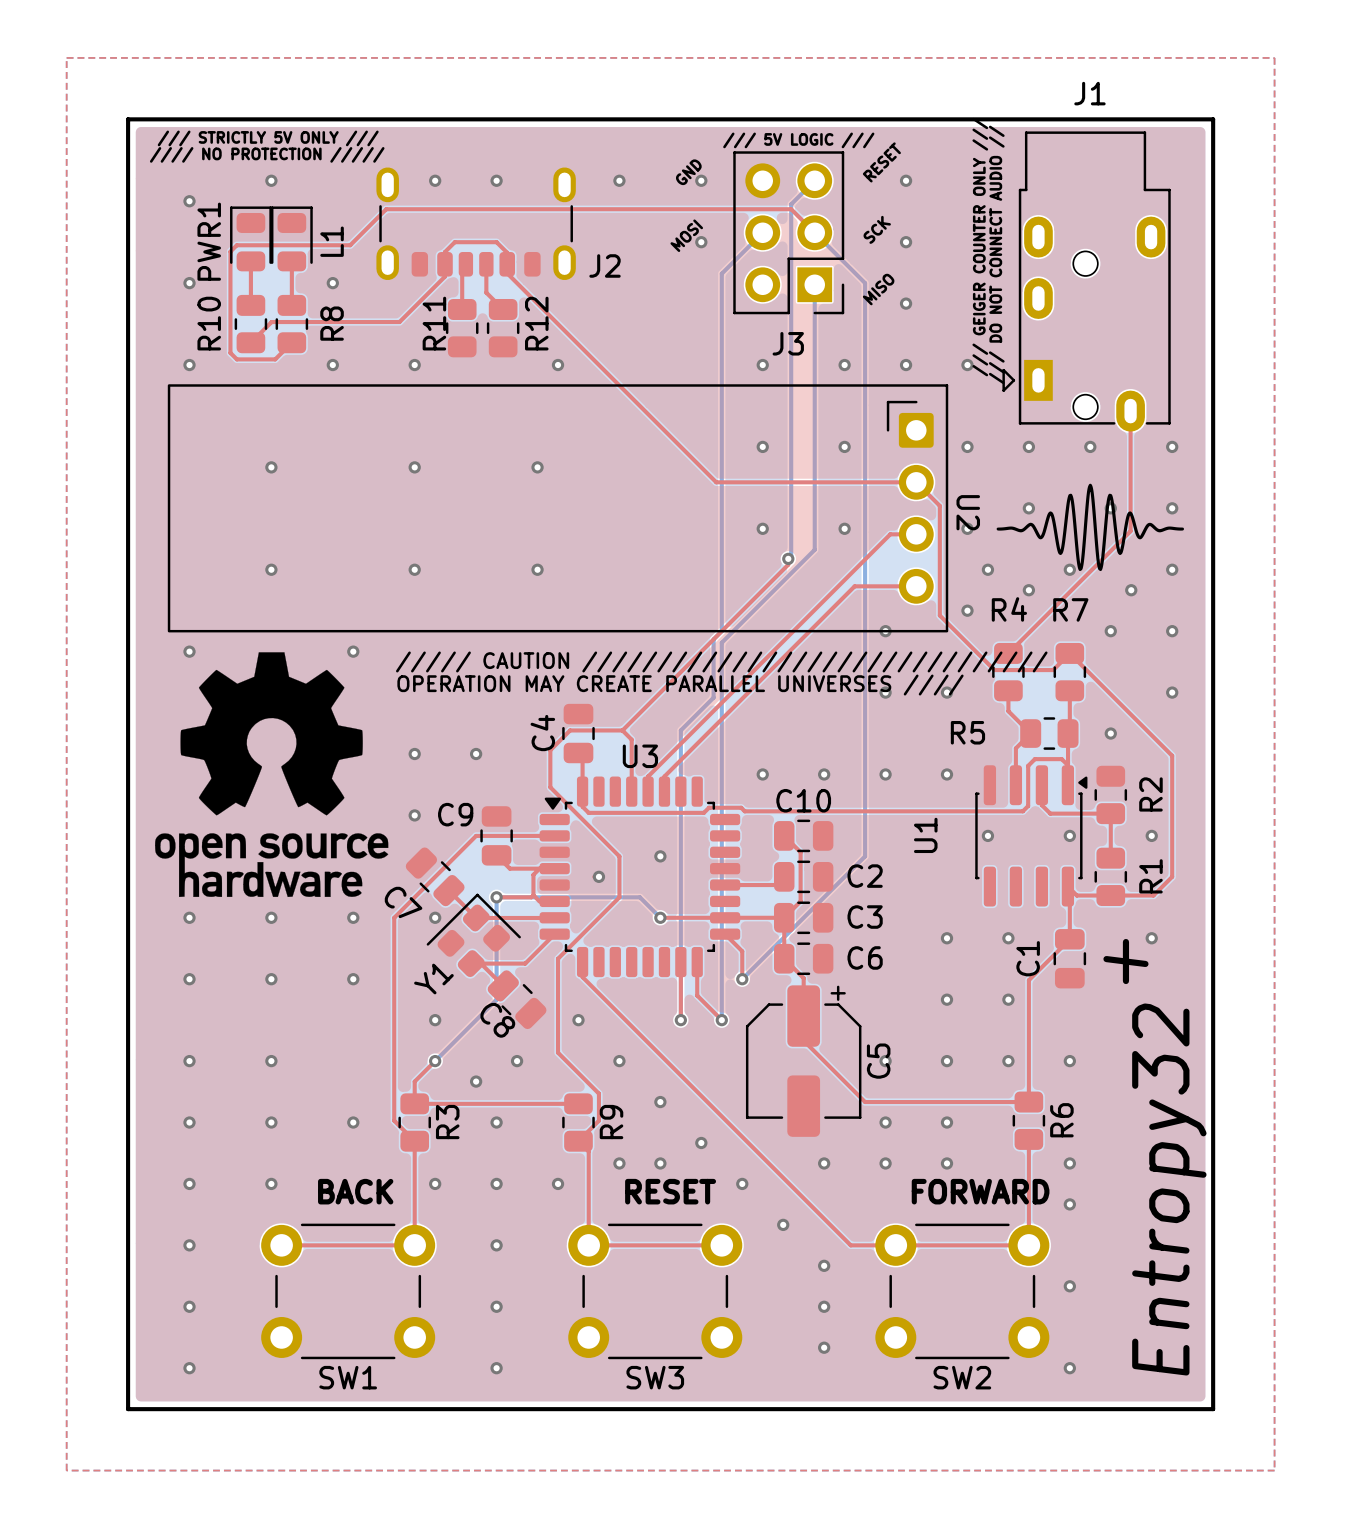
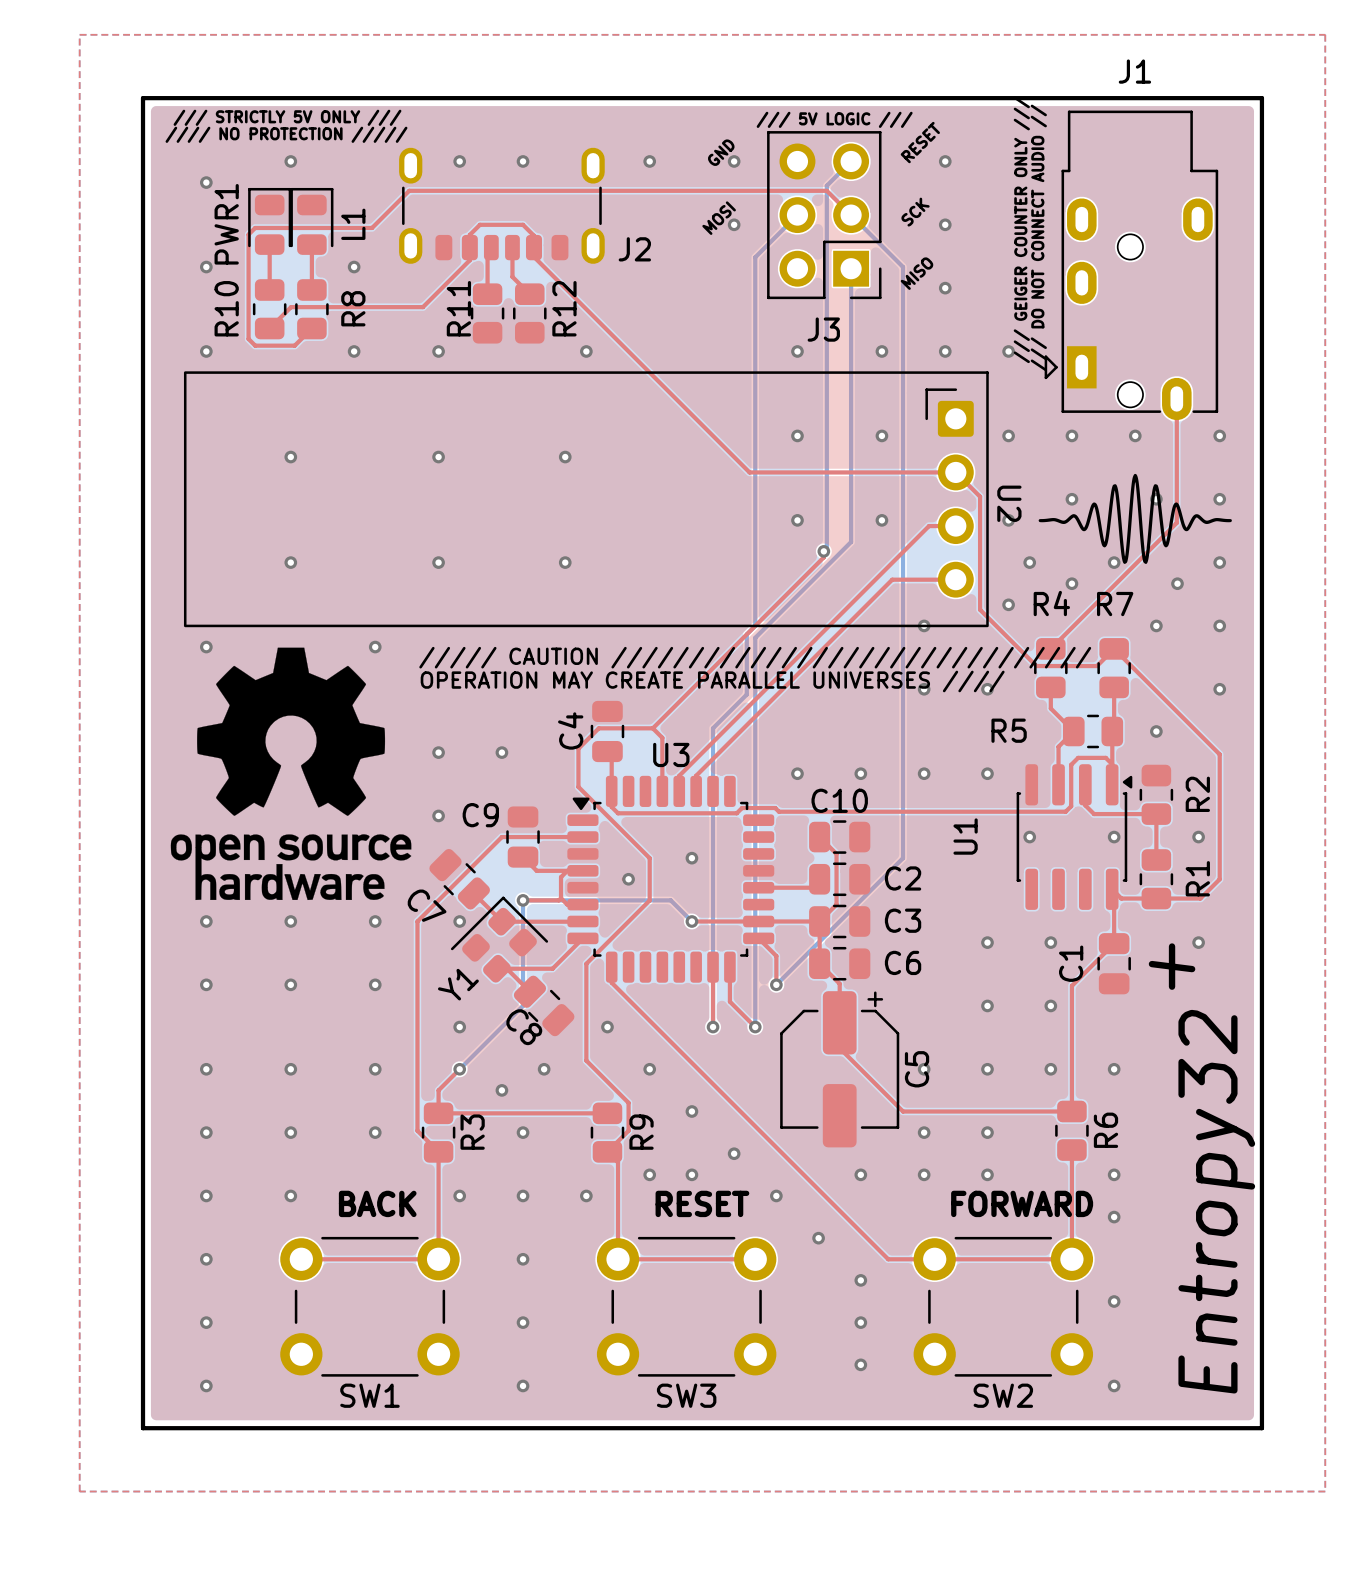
via: none -> (375, 1069)

